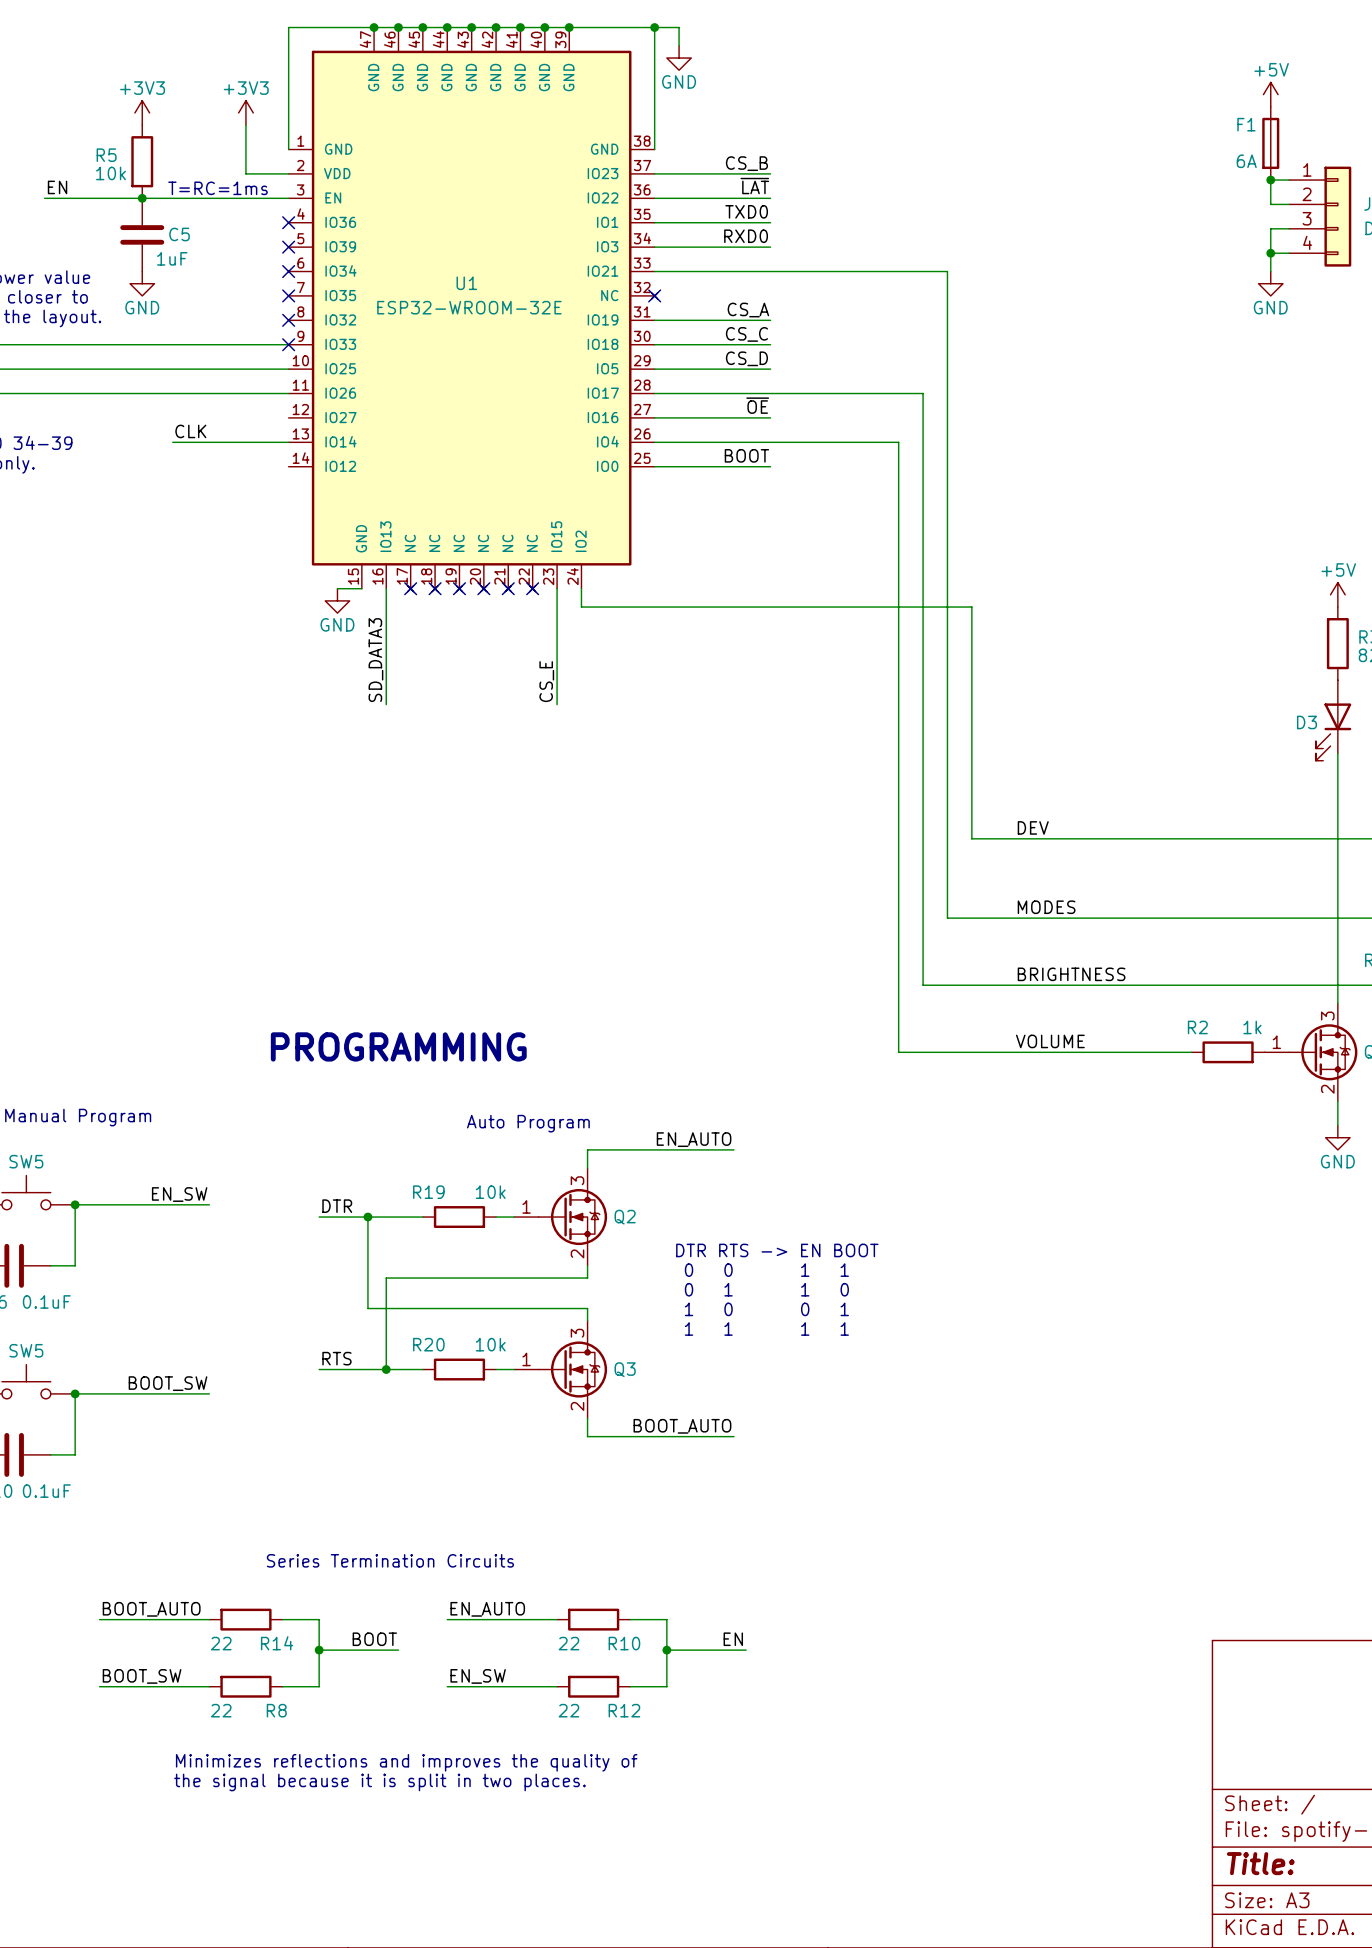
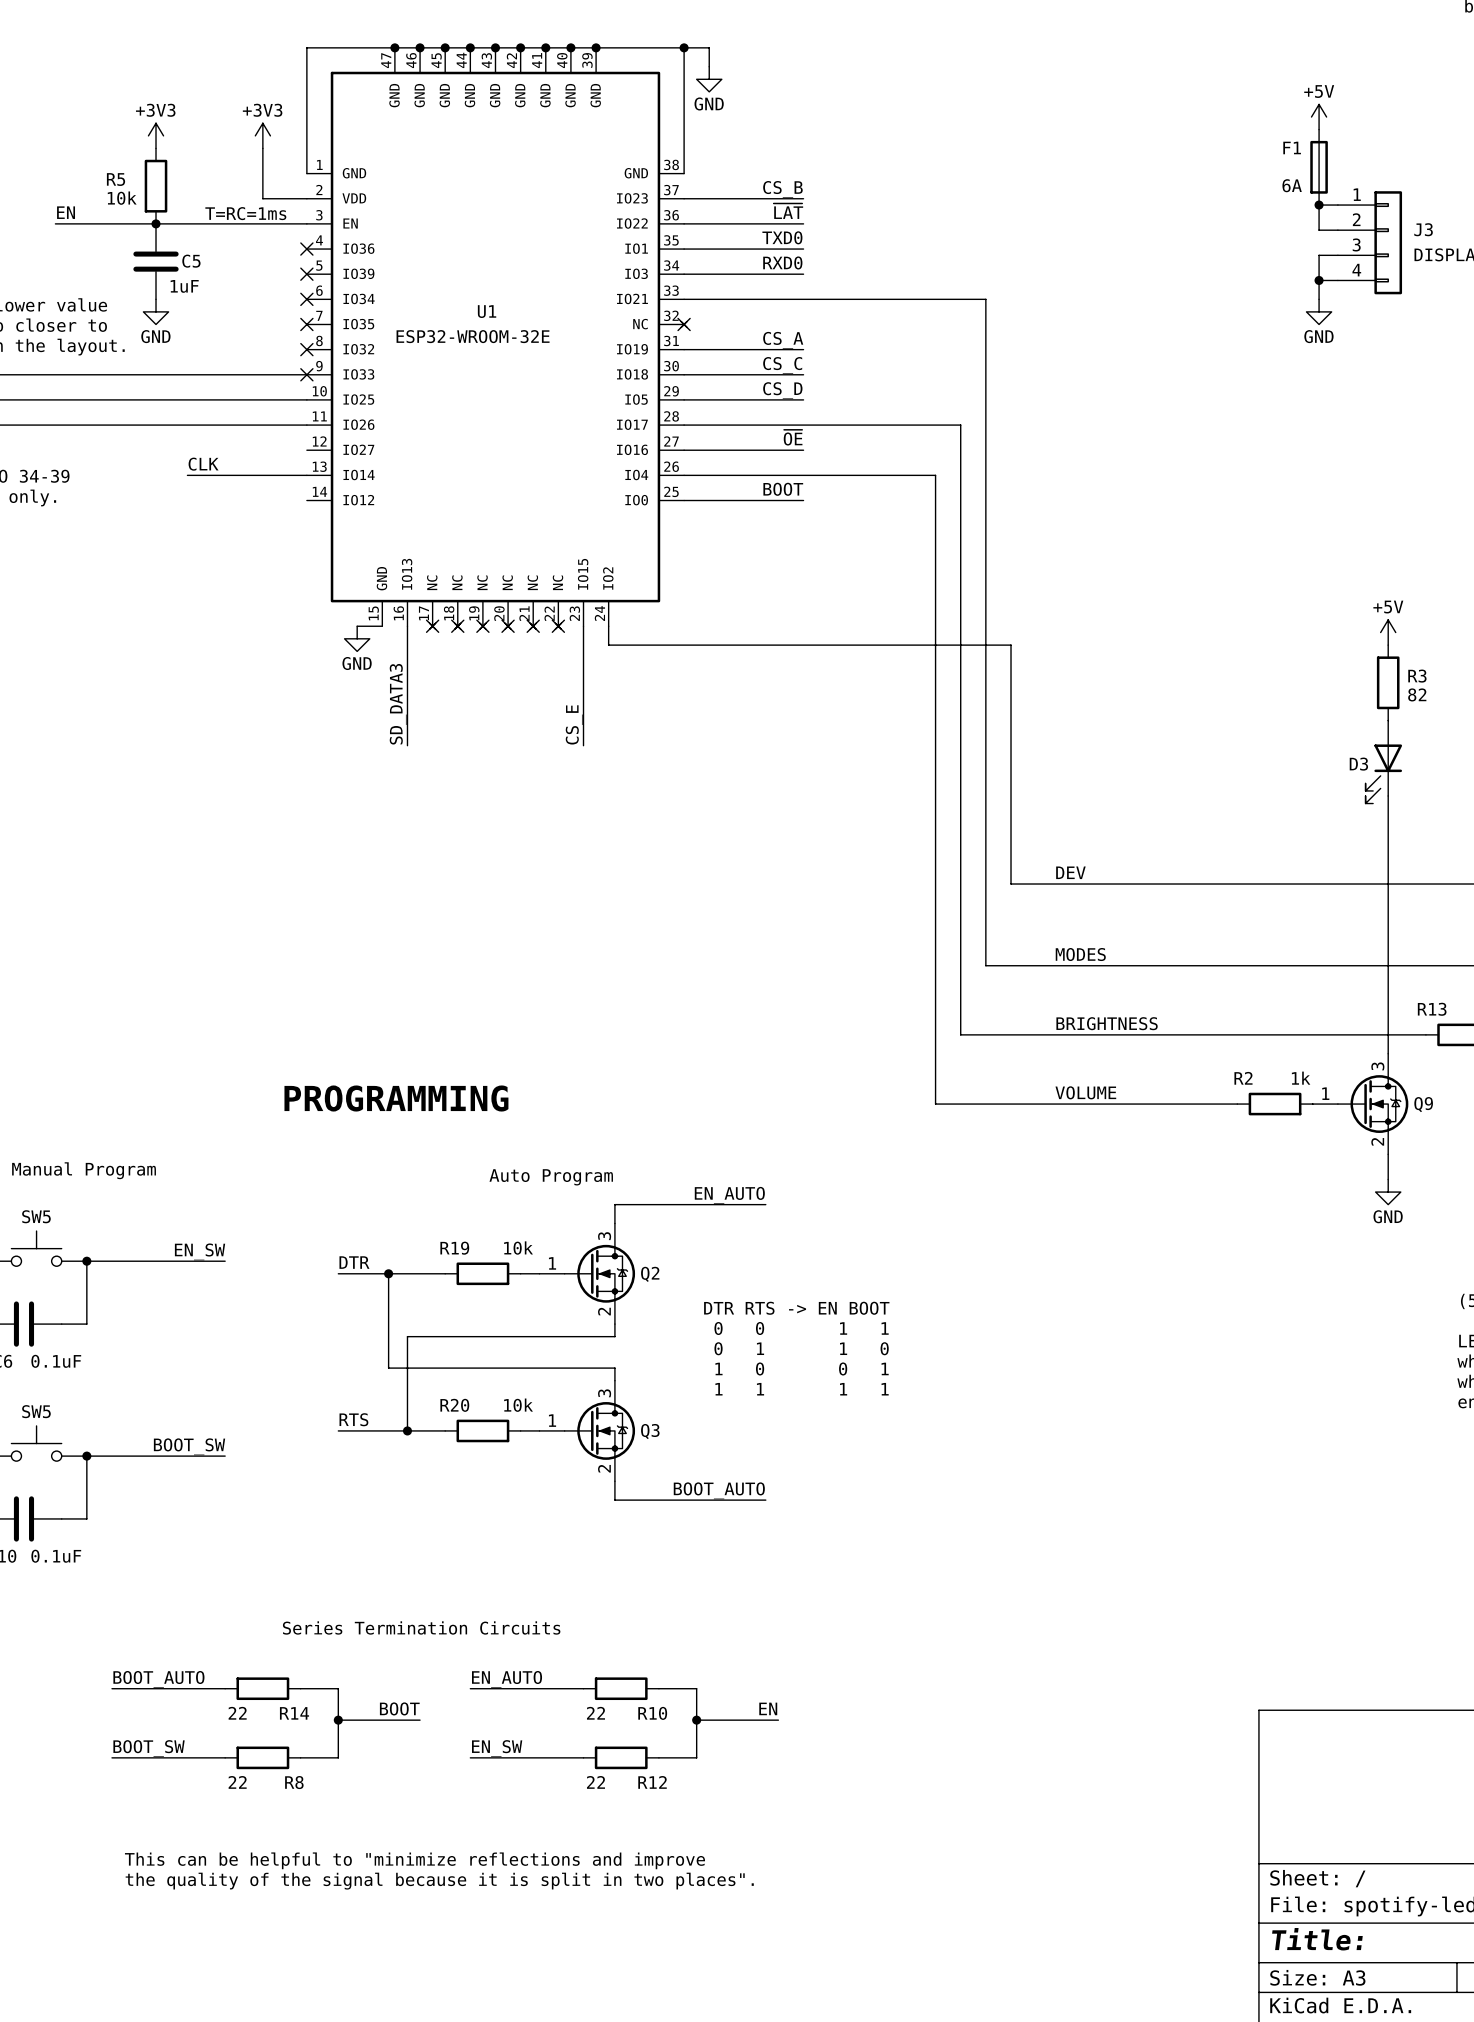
text: Minimizes reflections and improves the quality of (406, 1762) -> none
text: the signal because it is split in two places. (379, 1782) -> the quality of the signal because it is split in two places". (439, 1881)
text: none -> This can be helpful to "minimize reflections and improve (414, 1860)

